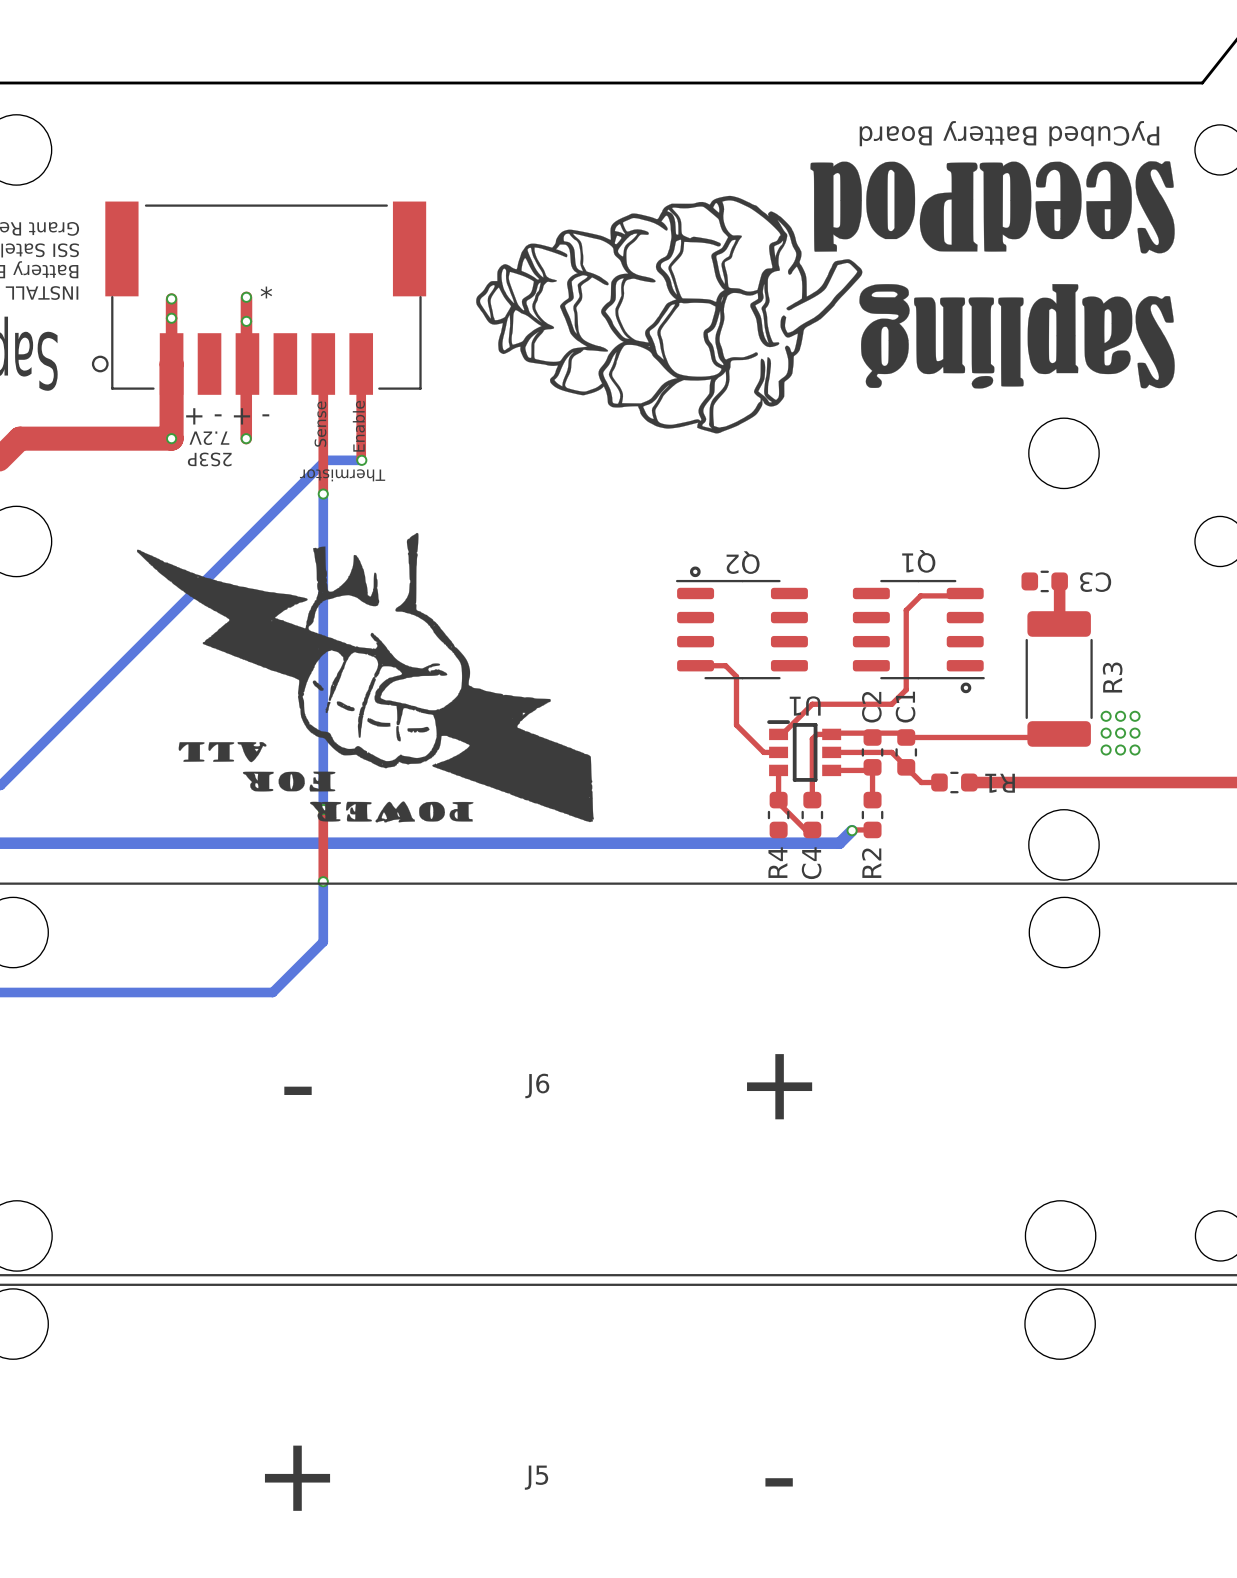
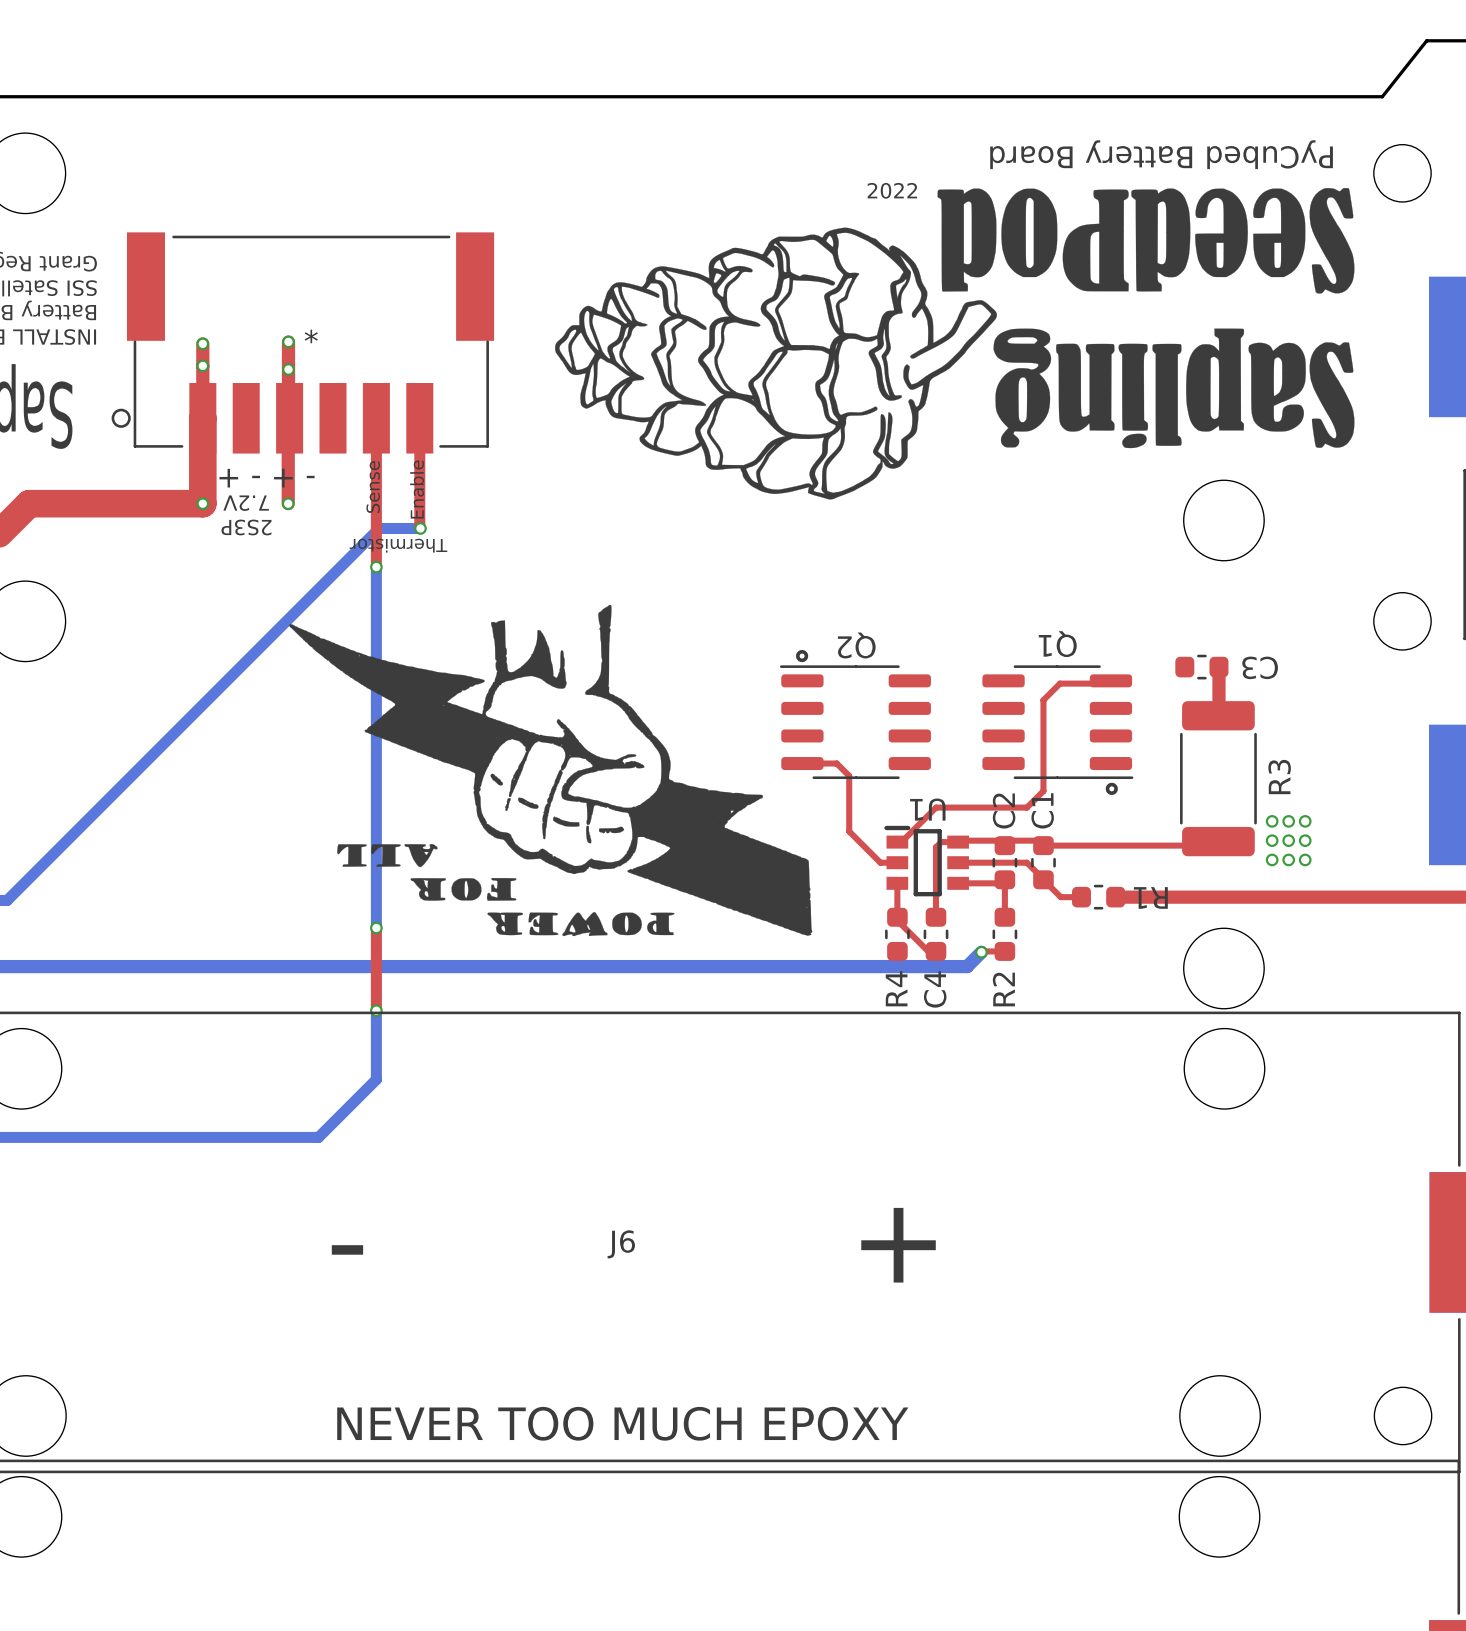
drawing shape: [476, 161, 1175, 434] -> [555, 182, 1355, 500]
drawing position: (365, 677) -> (550, 770)
text: none -> NEVER TOO MUCH EPOXY (622, 1423)

